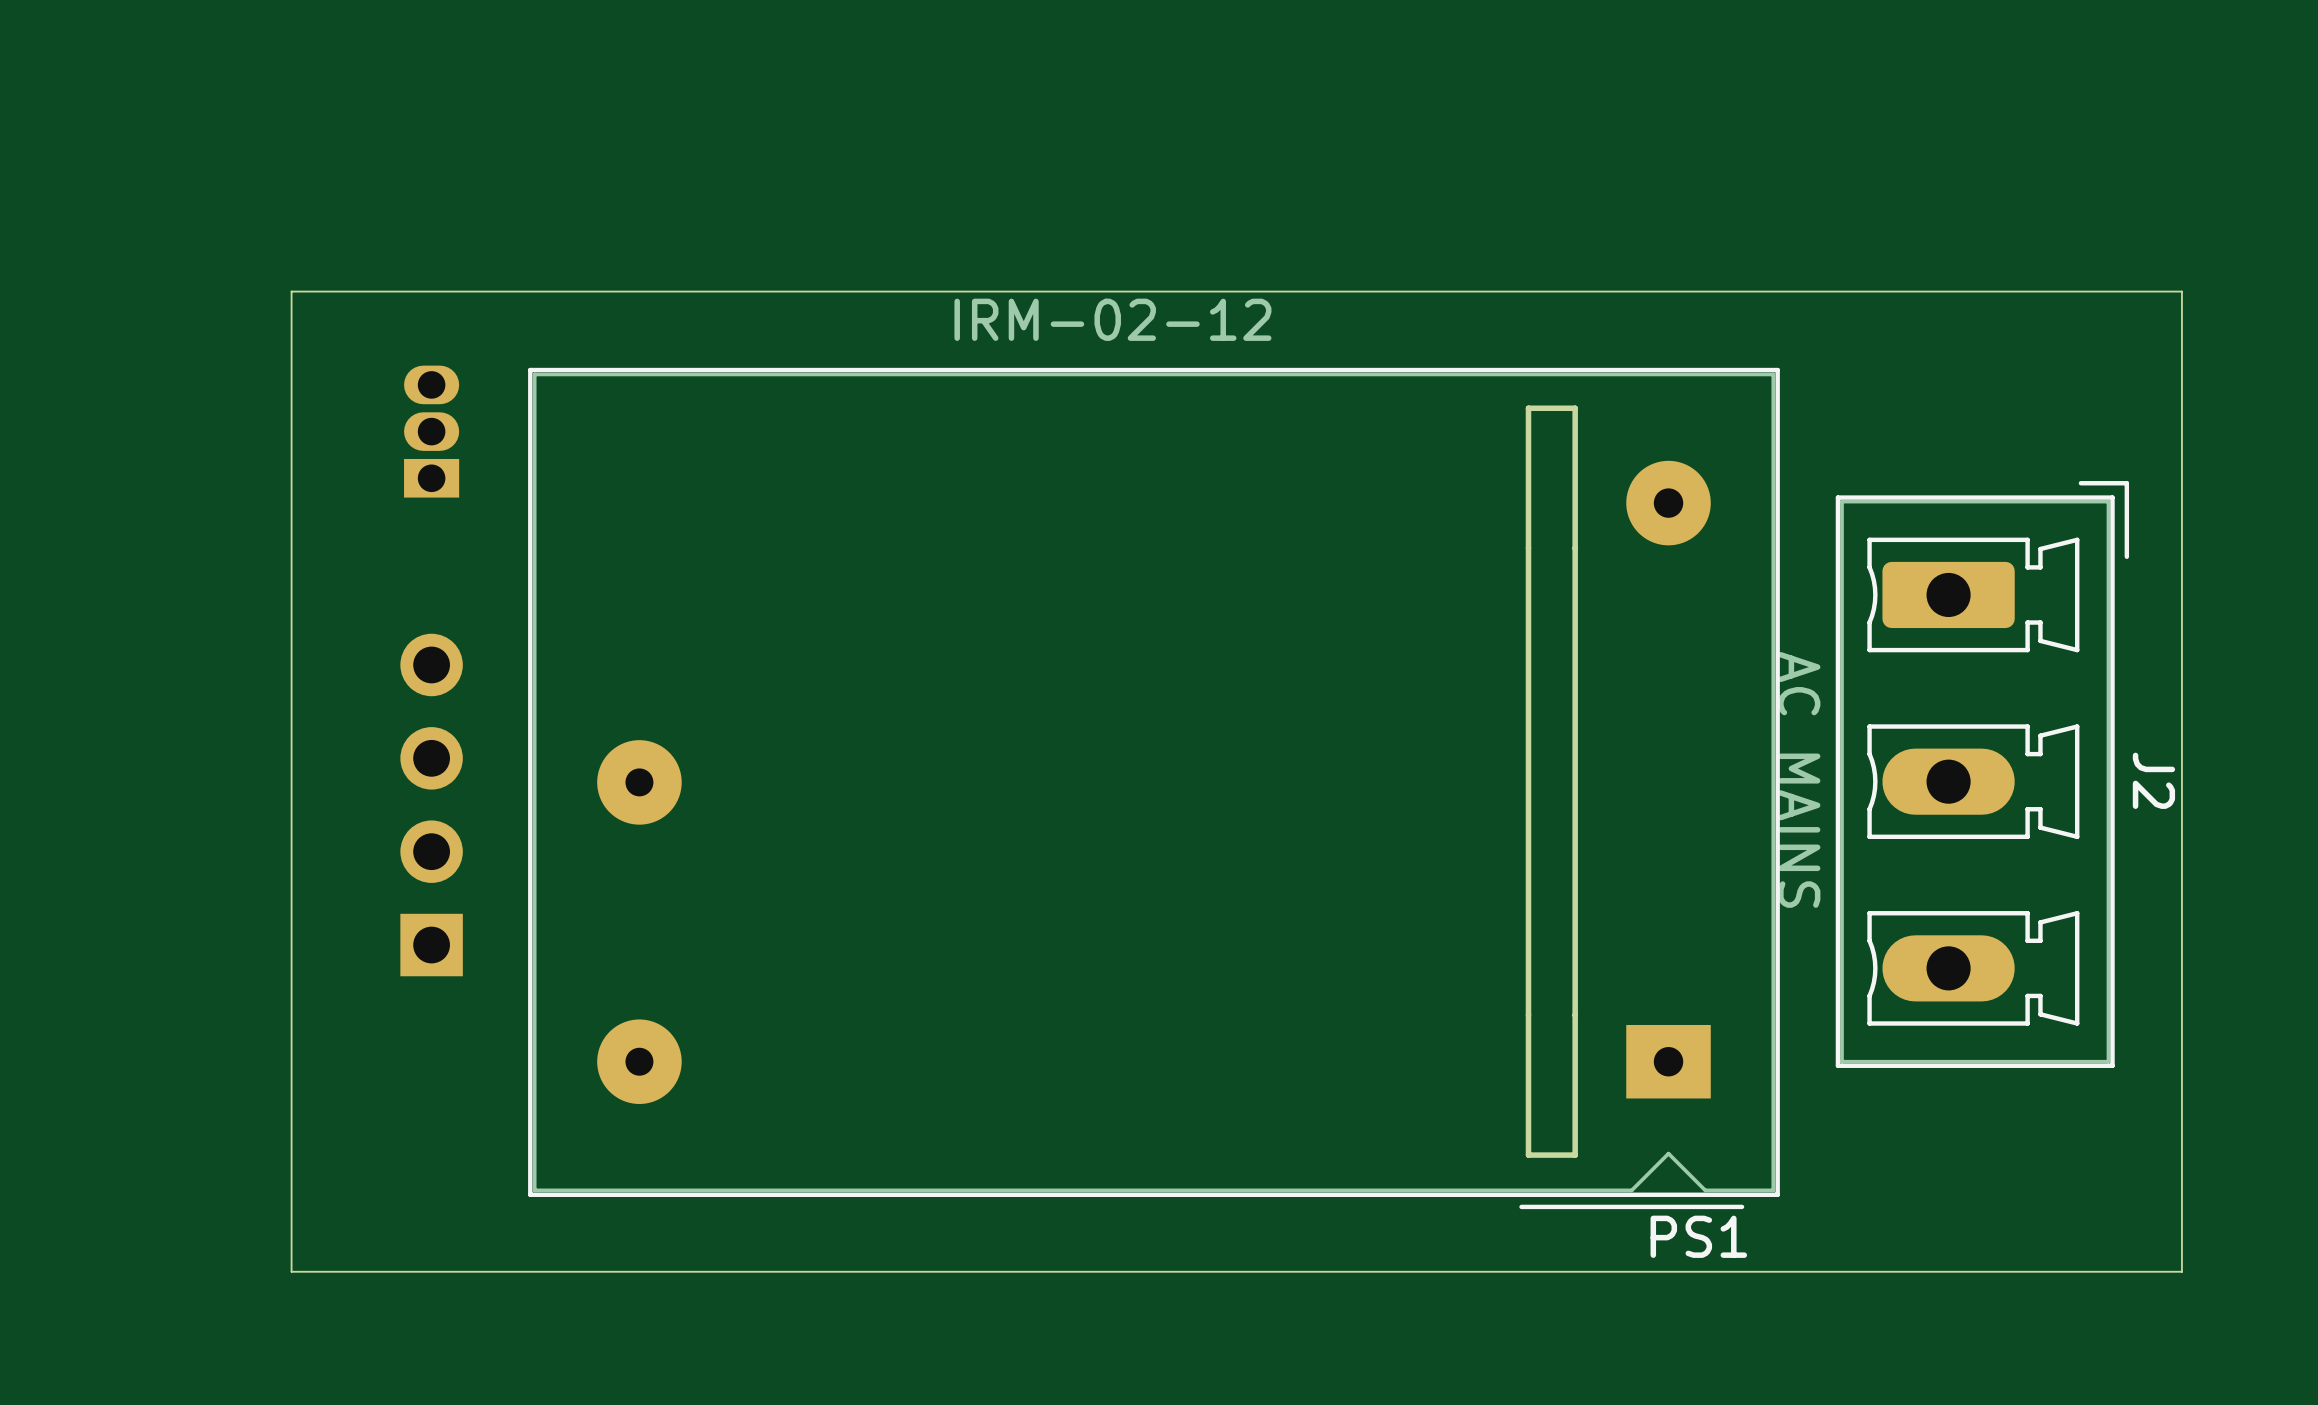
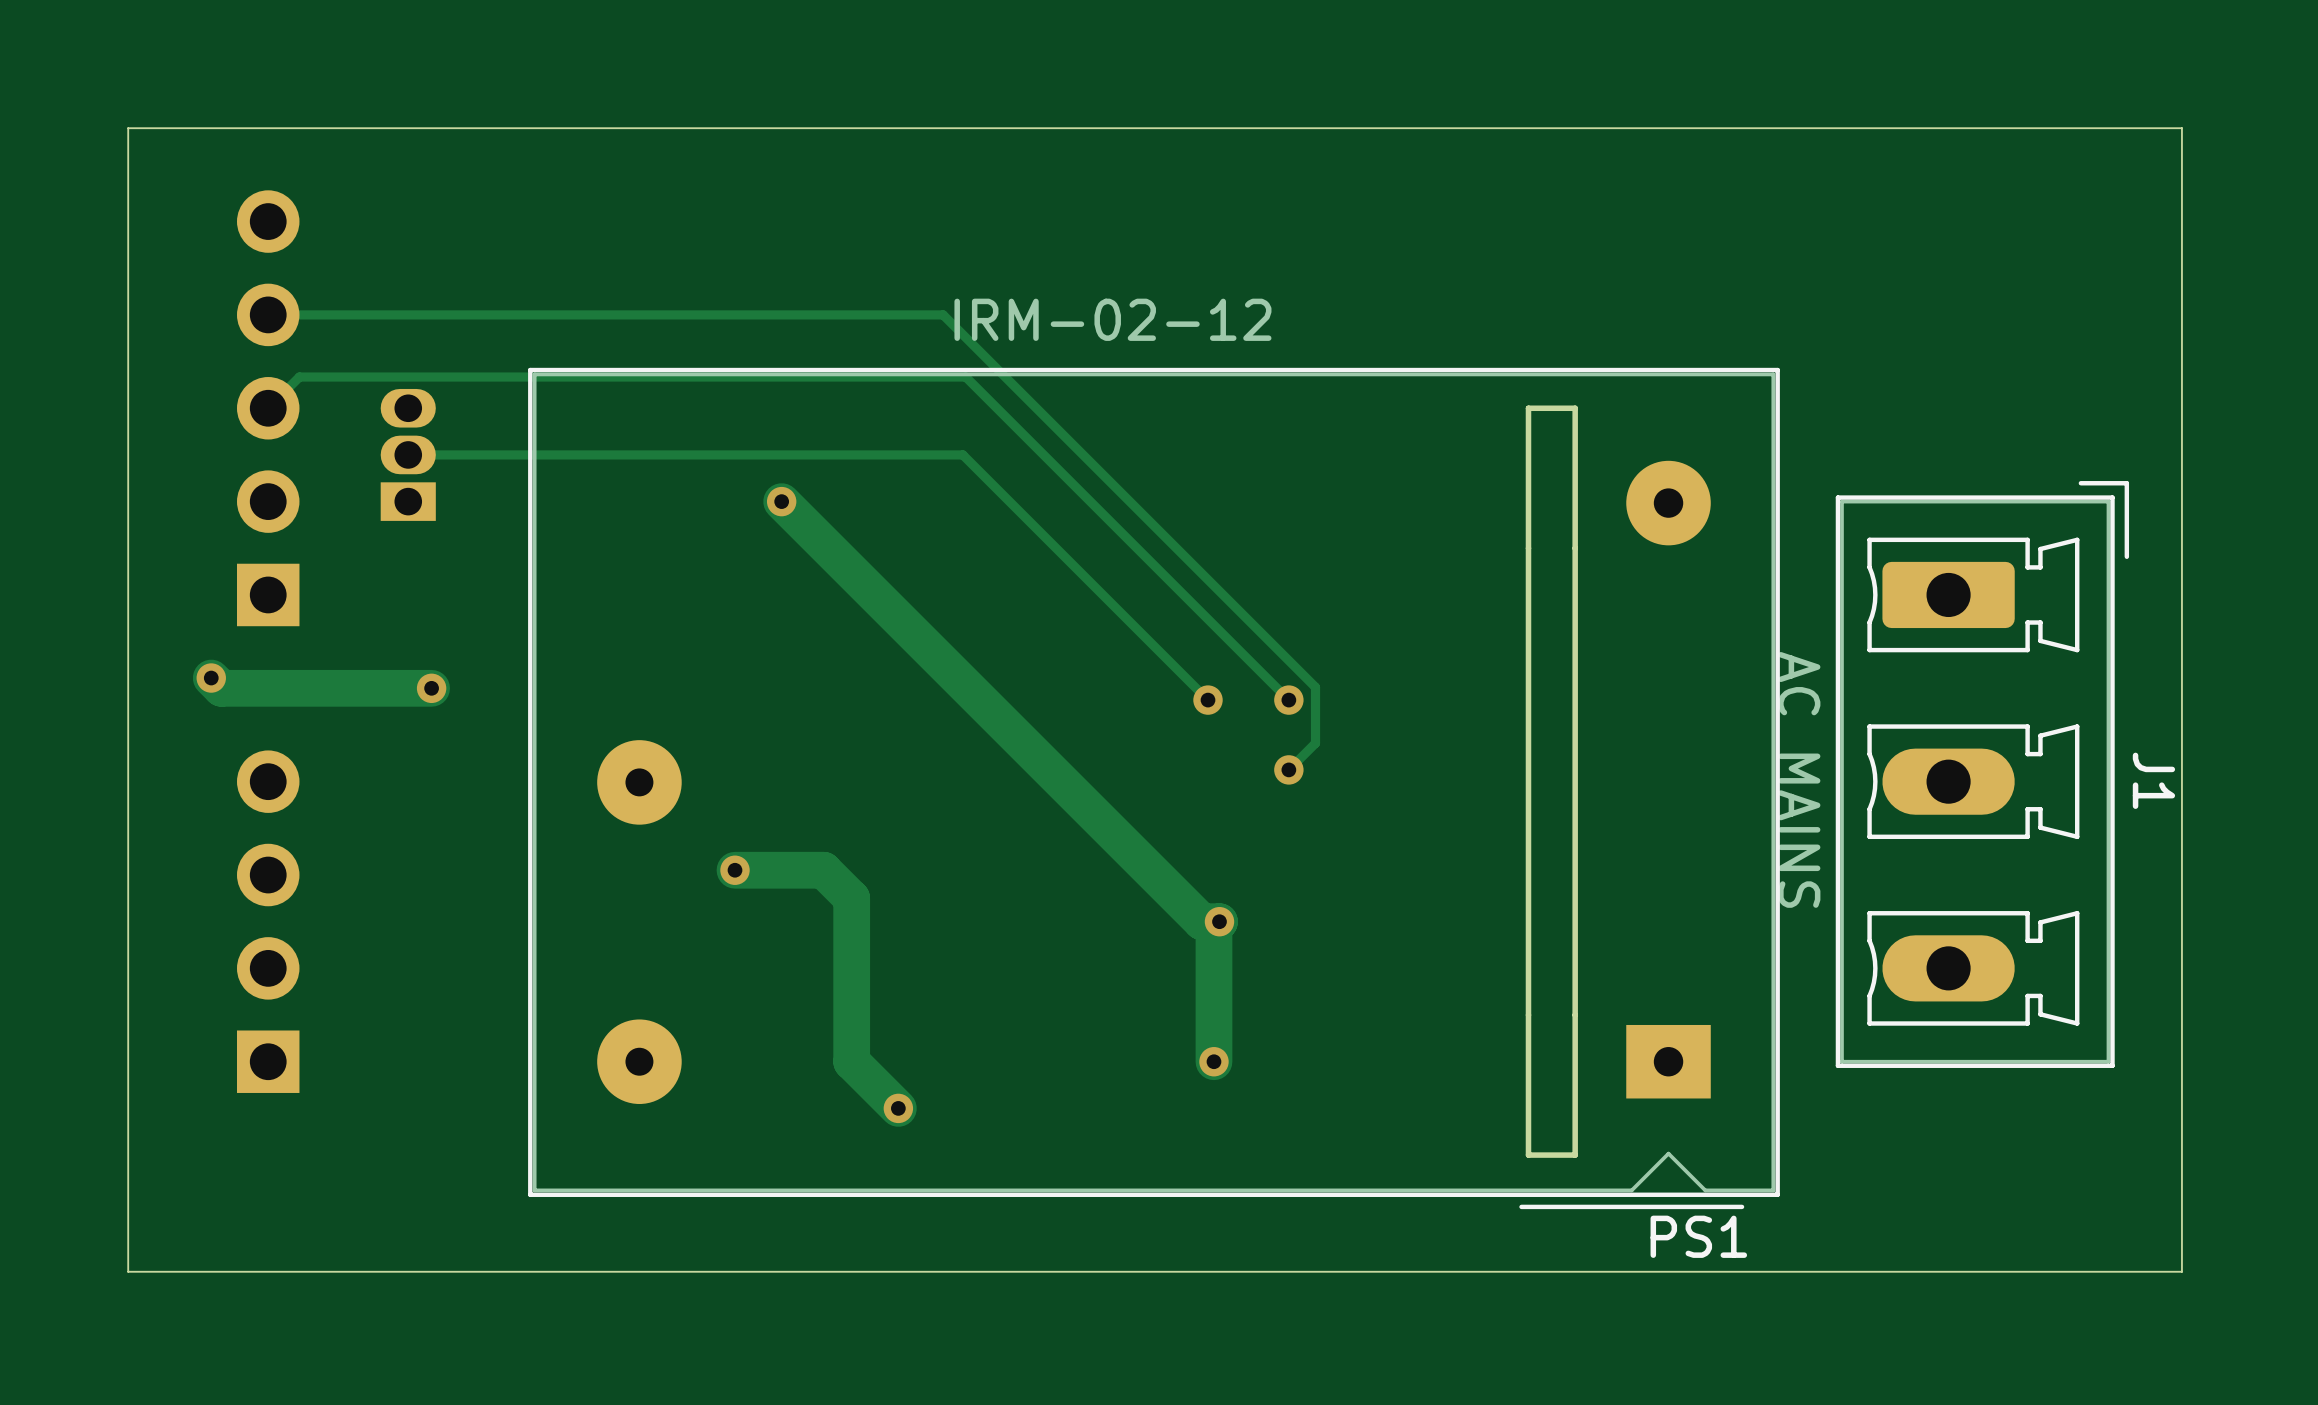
board edge: (2181, 291) (291, 291) (291, 1271) -> (2181, 291) (2181, 128) (128, 128) (128, 1271) (291, 1271)
track: none -> (268, 314) (943, 314) (1315, 687) (1315, 743) (1288, 769)
track: none -> (268, 408) (299, 377) (965, 377) (1288, 700)
part: none -> (268, 408)
part position: (431, 431) -> (408, 454)
track: none -> (408, 454) (962, 454) (1208, 700)
track: none -> (781, 501) (1201, 921) (1219, 921) (1213, 927) (1213, 1061)
via: none -> (781, 501)
track: none -> (211, 678) (221, 688) (431, 688)
via: none -> (211, 678)
via: none -> (431, 688)
via: none -> (1208, 700)
via: none -> (1288, 700)
via: none -> (1288, 769)
J2 name: J2 (2153, 780) -> J1 (2153, 780)
part position: (431, 805) -> (268, 921)
track: none -> (734, 870) (823, 870) (851, 898) (851, 1061) (898, 1108)
via: none -> (734, 870)
via: none -> (1219, 921)
via: none -> (1213, 1061)
via: none -> (898, 1108)

